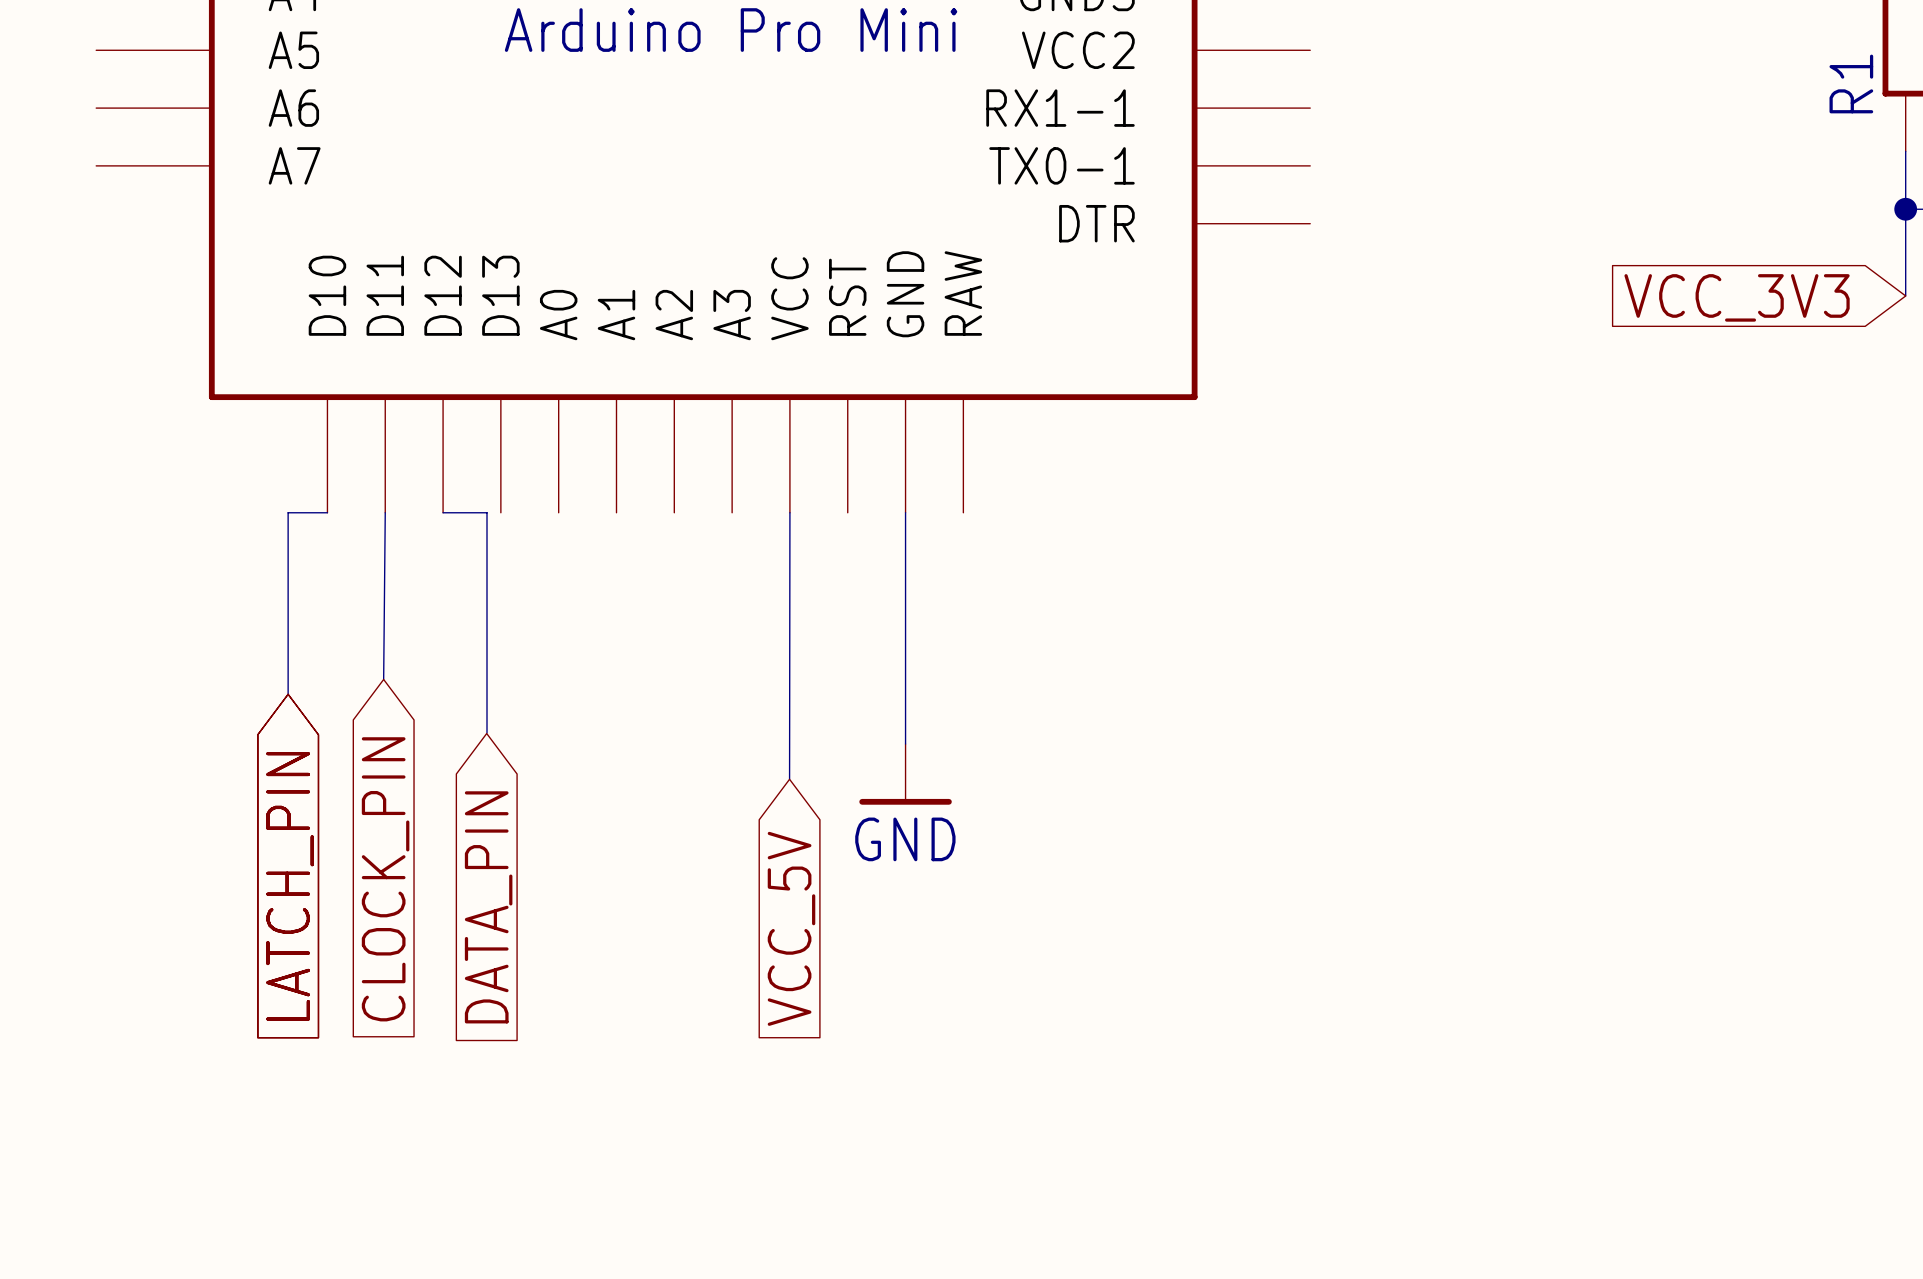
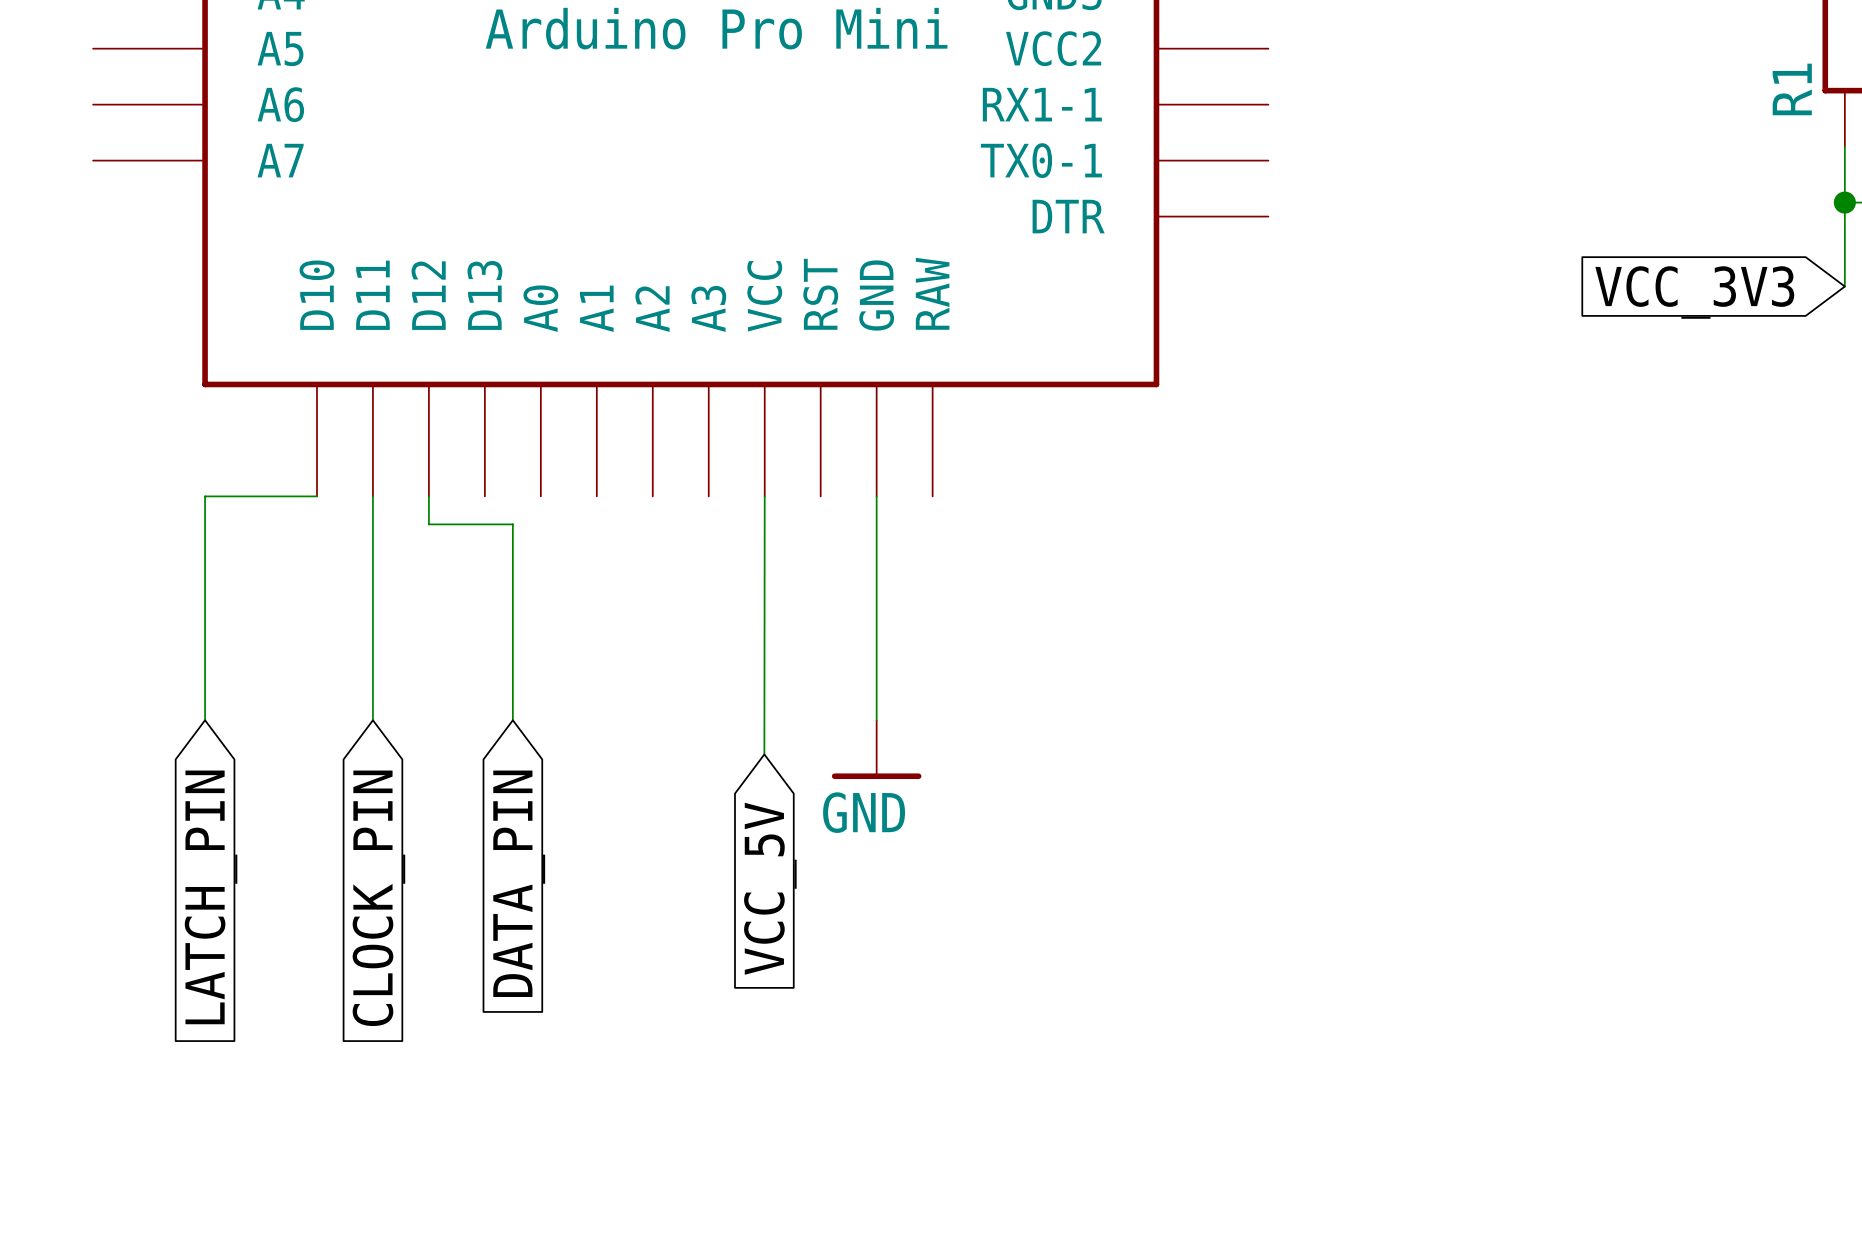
wire: (288, 512) (288, 694) -> (278, 496) (205, 496) (205, 720)
wire: (385, 512) (383, 679) -> (372, 496) (372, 720)
wire: (443, 512) (487, 512) (487, 733) -> (428, 496) (428, 524) (512, 524) (512, 720)
global label position: CLOCK_PIN (385, 879) -> CLOCK_PIN (378, 898)
global label position: LATCH_PIN (290, 886) -> LATCH_PIN (211, 897)
global label position: DATA_PIN (488, 907) -> DATA_PIN (519, 883)

